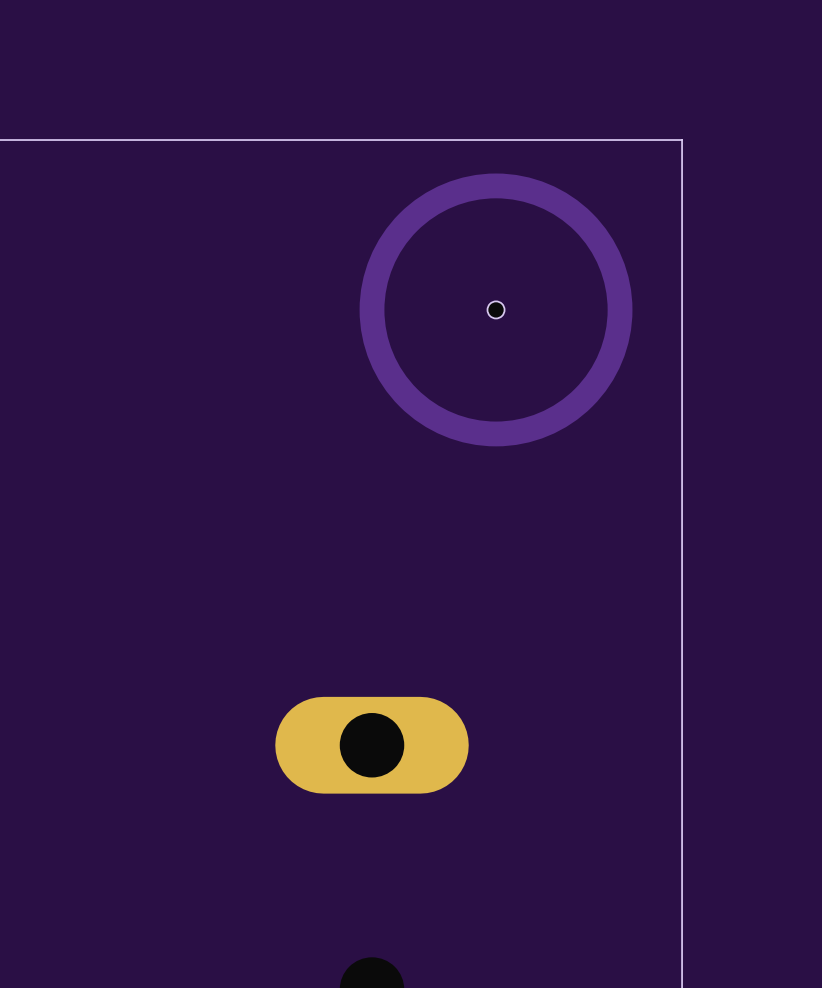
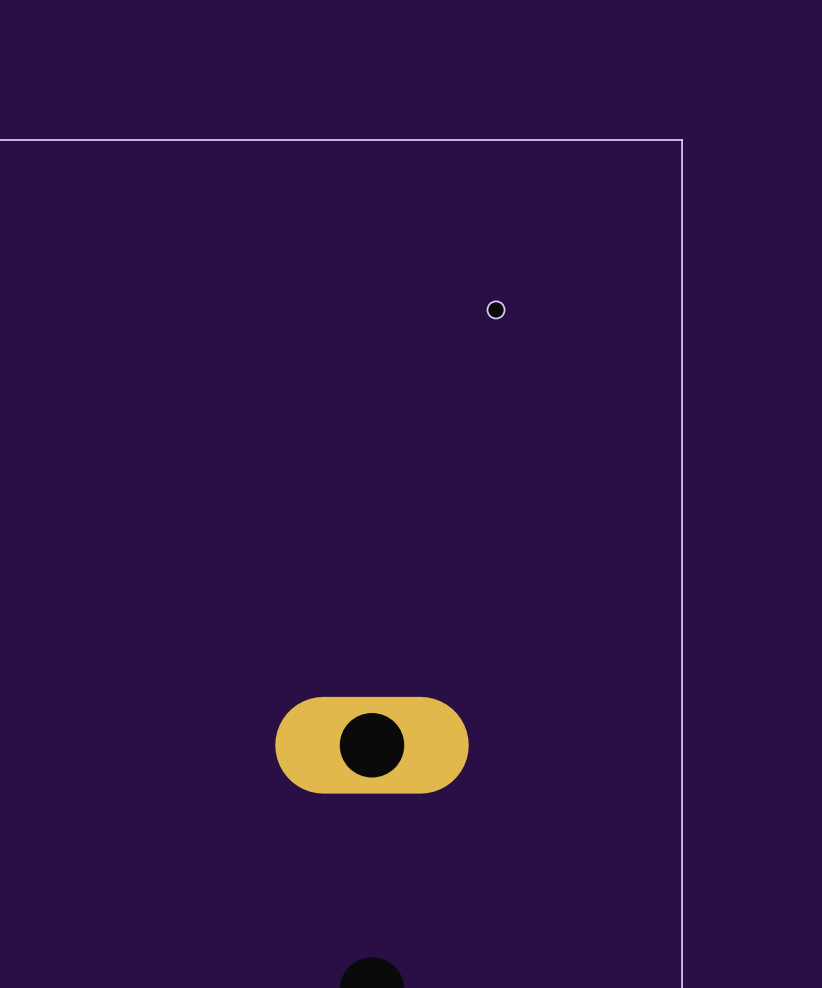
drawing: [359, 173, 633, 447] -> none

